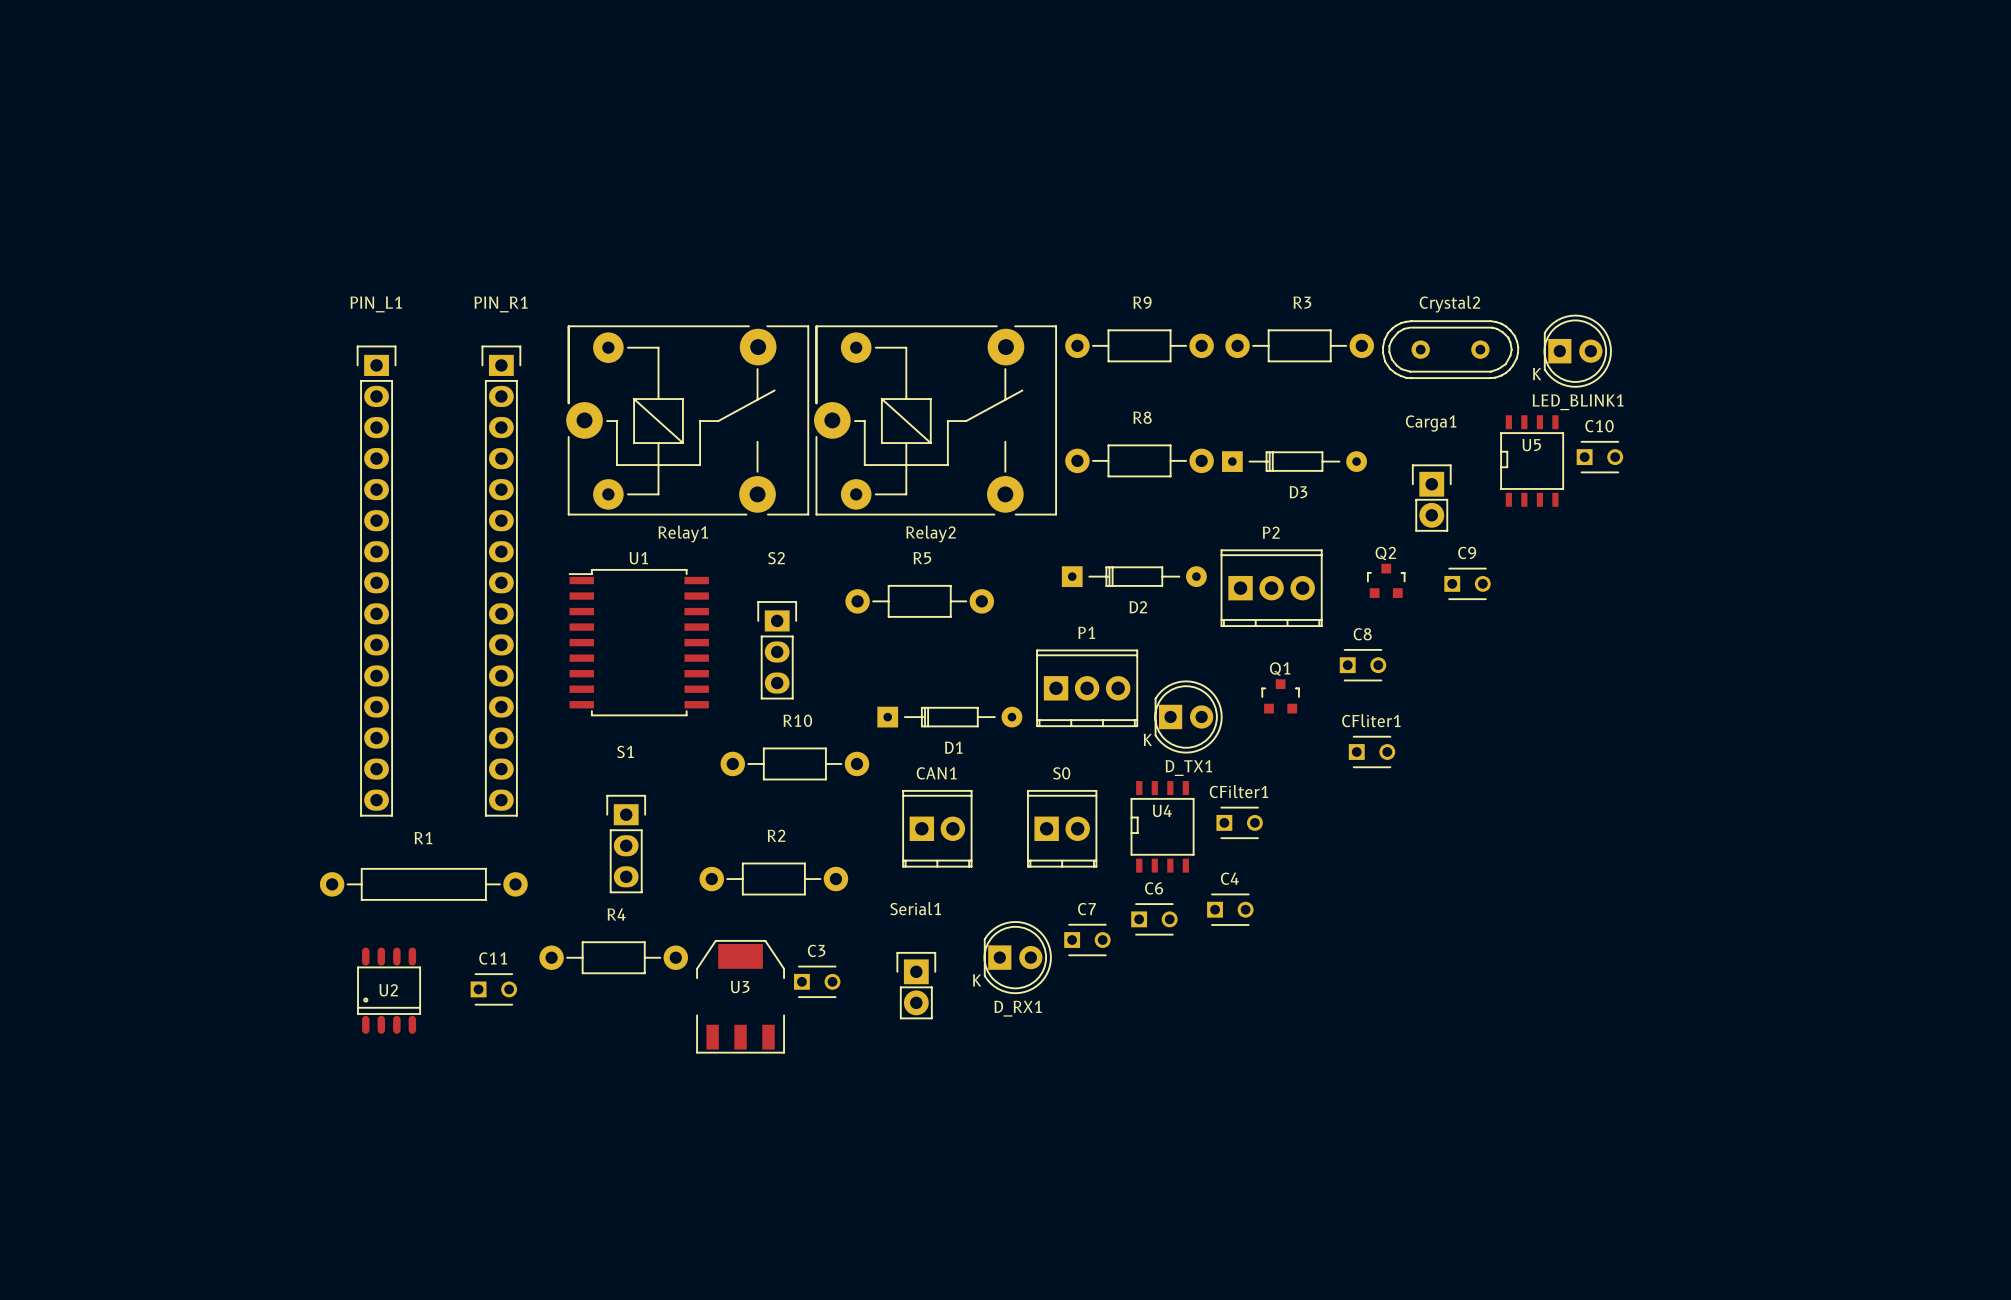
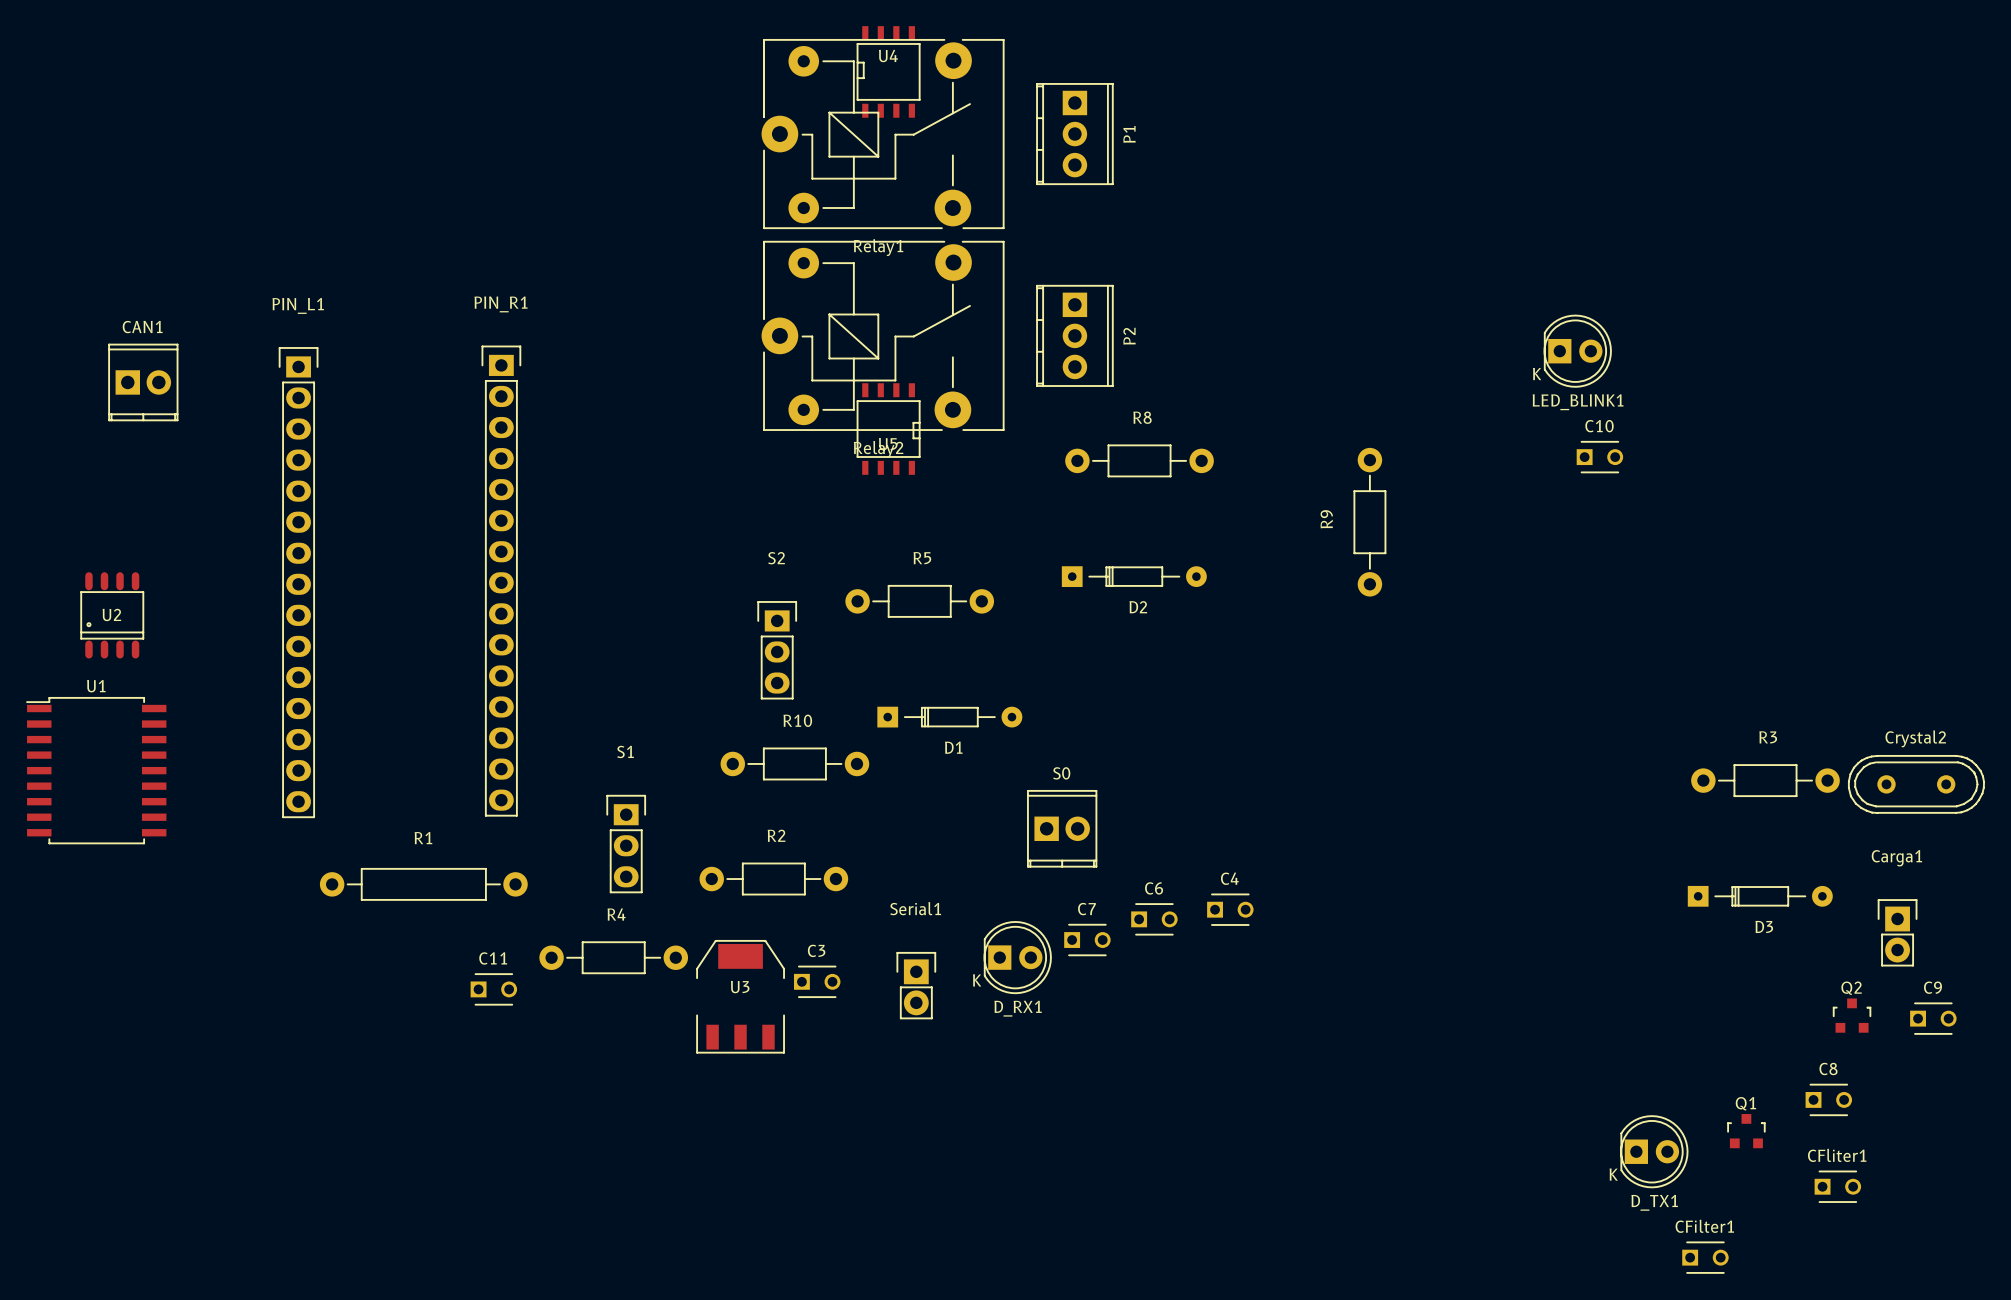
R9 name position: R9 (1142, 302) -> R9 (1326, 519)
R9 rotation: 0° (1139, 345) -> 90° clockwise (1369, 522)
R9 position: (1139, 345) -> (1369, 522)
R3 position: (1299, 345) -> (1765, 780)
Crystal2 position: (1450, 349) -> (1916, 784)
Relay1 position: (687, 420) -> (883, 134)
Relay2 position: (935, 420) -> (883, 335)
D3 position: (1294, 461) -> (1760, 896)
U5 rotation: 0° (1532, 461) -> 180° (888, 429)
U5 position: (1532, 461) -> (888, 429)
Carga1 position: (1431, 498) -> (1897, 932)
Q2 position: (1386, 580) -> (1852, 1015)
PIN_L1 position: (376, 581) -> (298, 582)
C9 position: (1467, 583) -> (1933, 1018)
P2 rotation: 0° (1271, 588) -> 90° clockwise (1074, 335)
P2 position: (1271, 588) -> (1074, 335)
U1 position: (638, 642) -> (96, 770)
C8 position: (1363, 665) -> (1828, 1099)
P1 rotation: 0° (1087, 688) -> 90° clockwise (1074, 134)
P1 position: (1087, 688) -> (1074, 134)
Q1 position: (1280, 696) -> (1746, 1131)
D_TX1 position: (1188, 716) -> (1654, 1151)
CFliter1 position: (1372, 751) -> (1837, 1186)
CFilter1 position: (1239, 822) -> (1705, 1257)
U4 position: (1162, 826) -> (888, 71)
CAN1 position: (937, 828) -> (143, 382)
U2 position: (389, 990) -> (112, 615)

